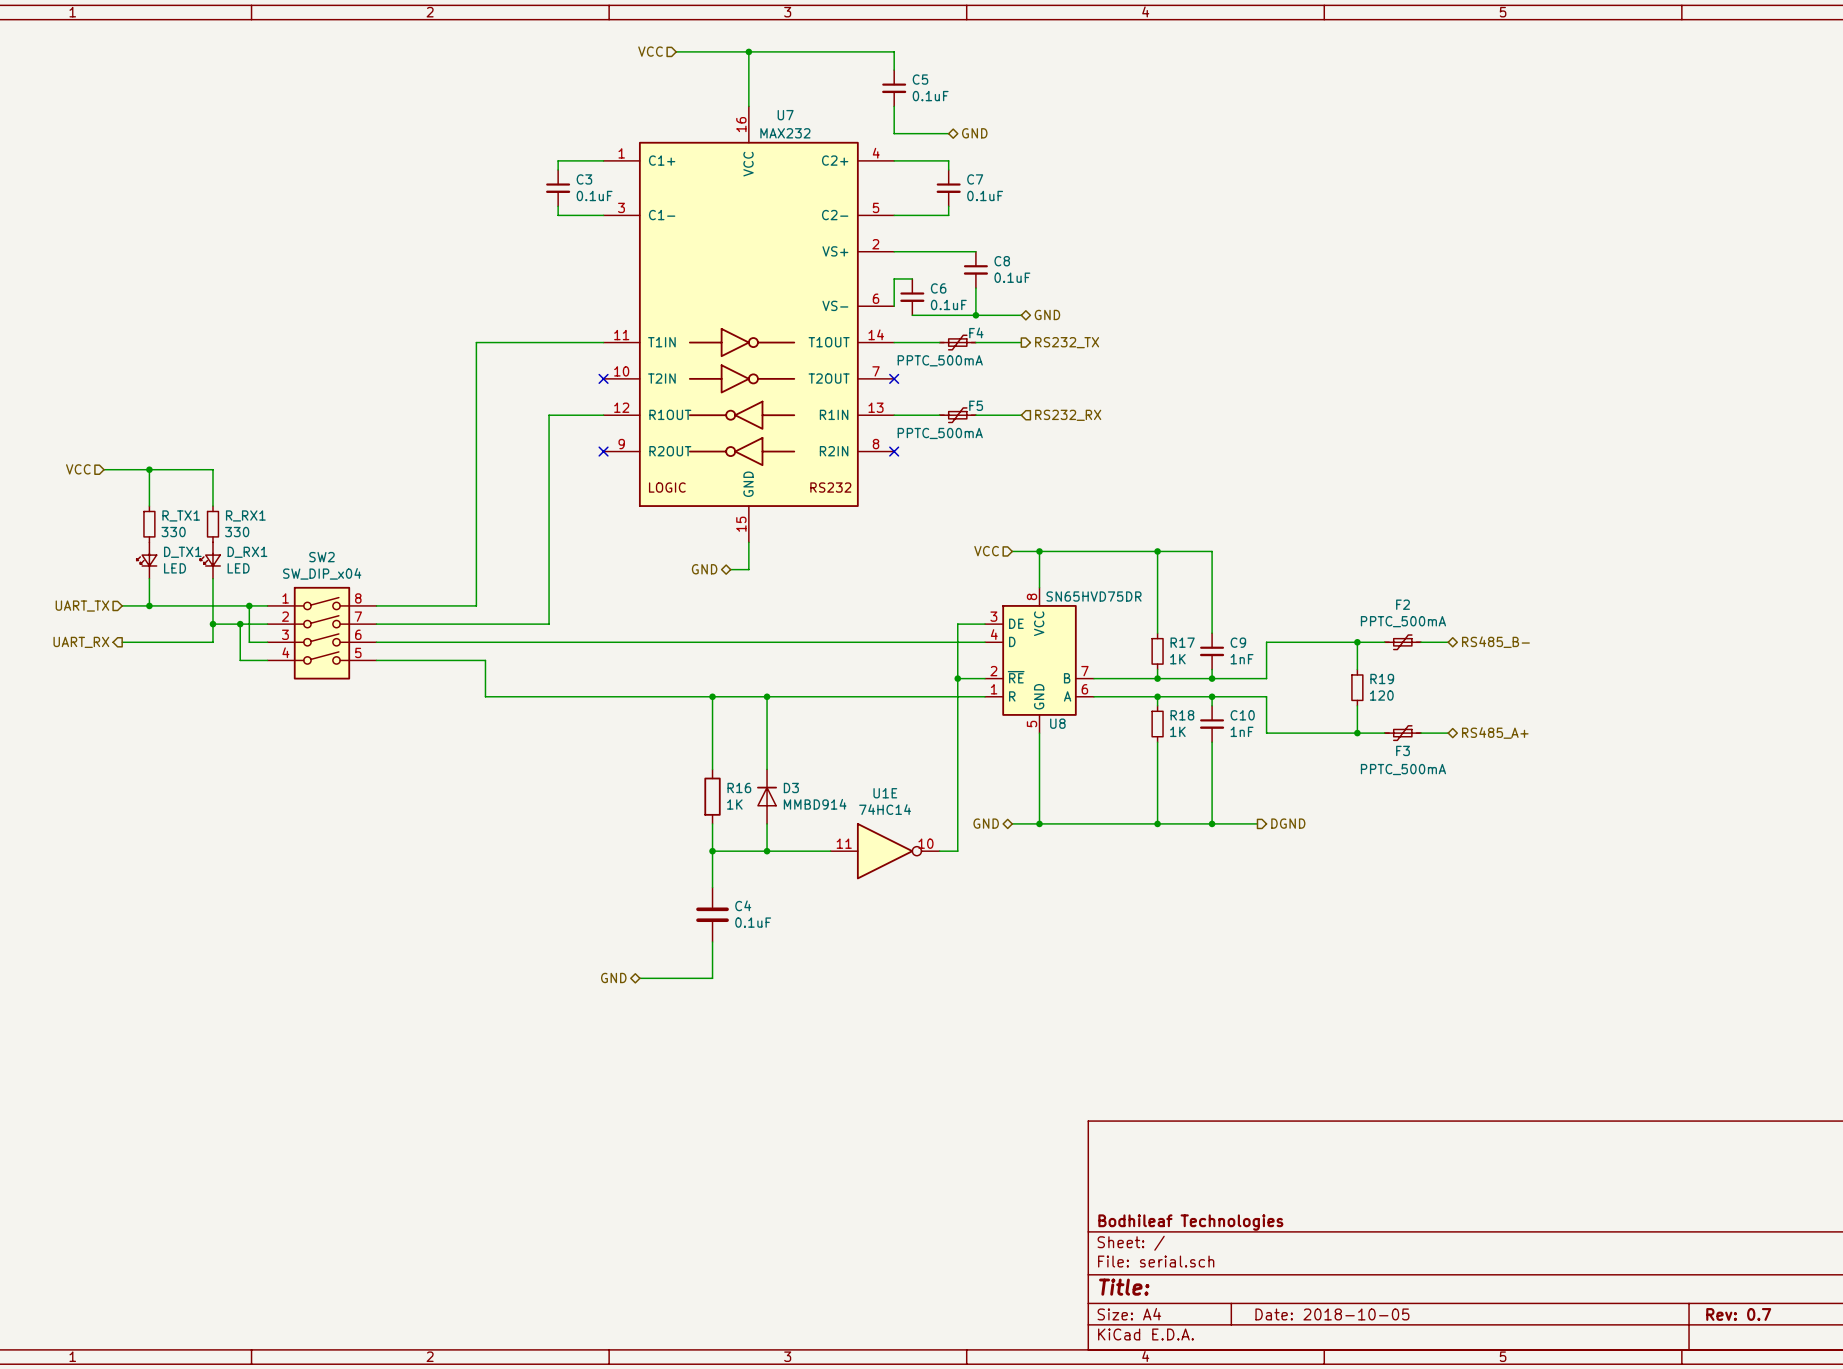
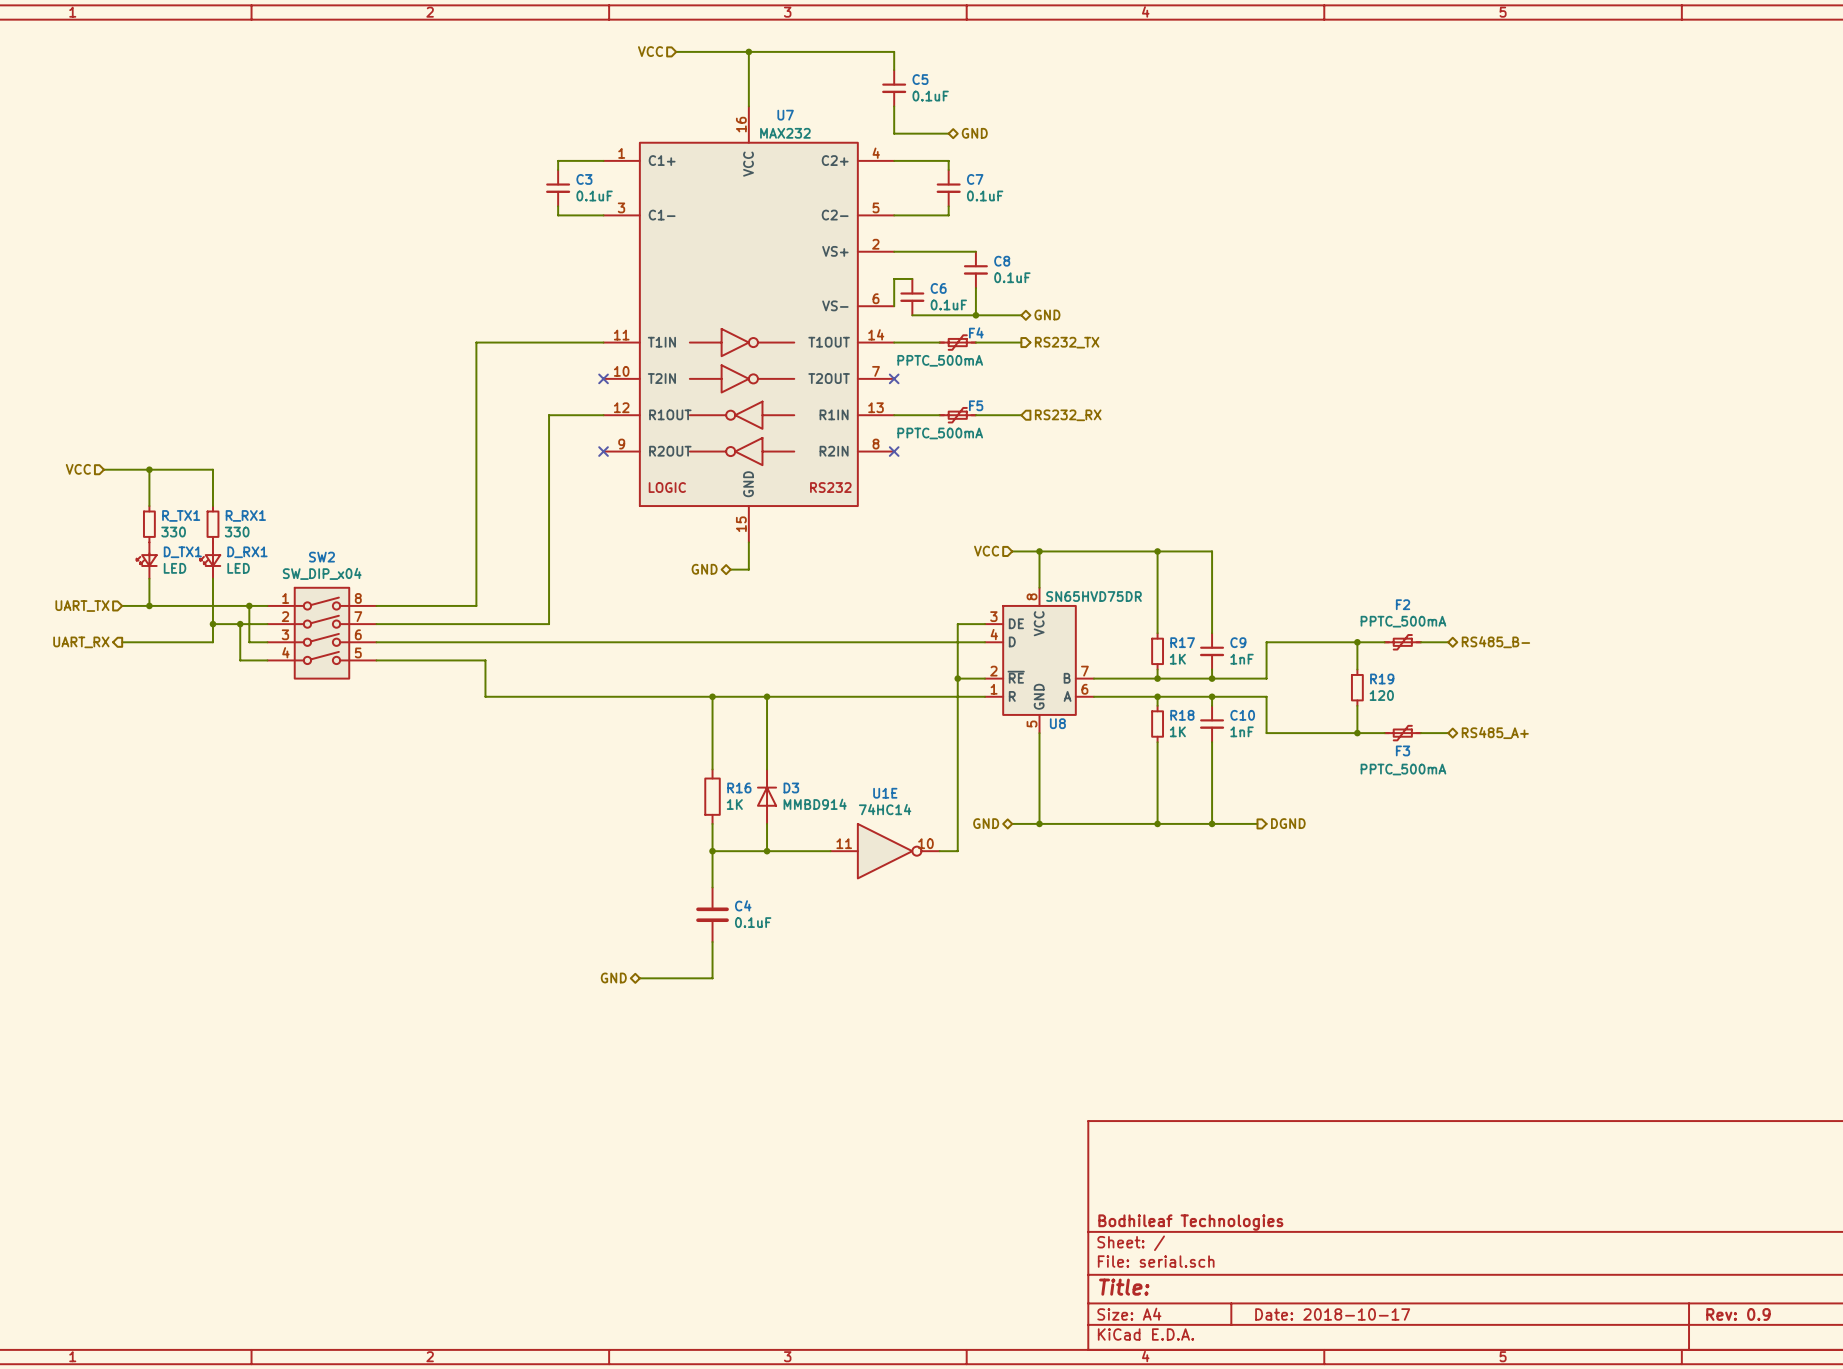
title block: Date: 2018-10-05 (1332, 1314) -> Date: 2018-10-17 (1332, 1314)
title block: Rev: 0.7 (1738, 1314) -> Rev: 0.9 (1738, 1314)

